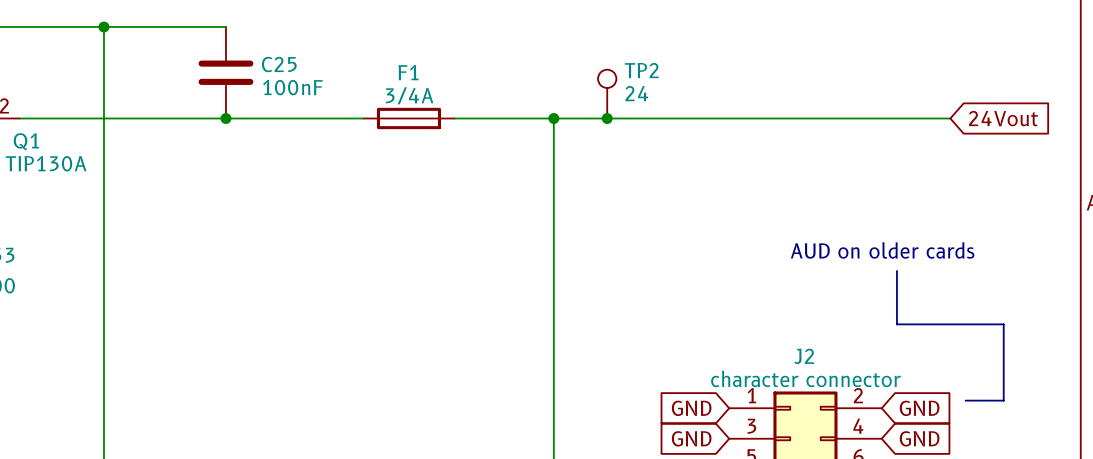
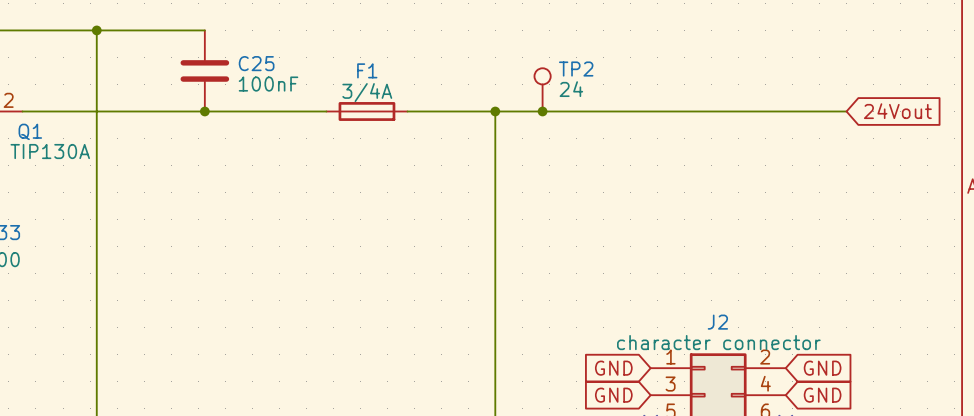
text: AUD on older cards (882, 250) -> none
line: (896, 270) (896, 324) (1003, 324) (1003, 400) (965, 400) -> none

